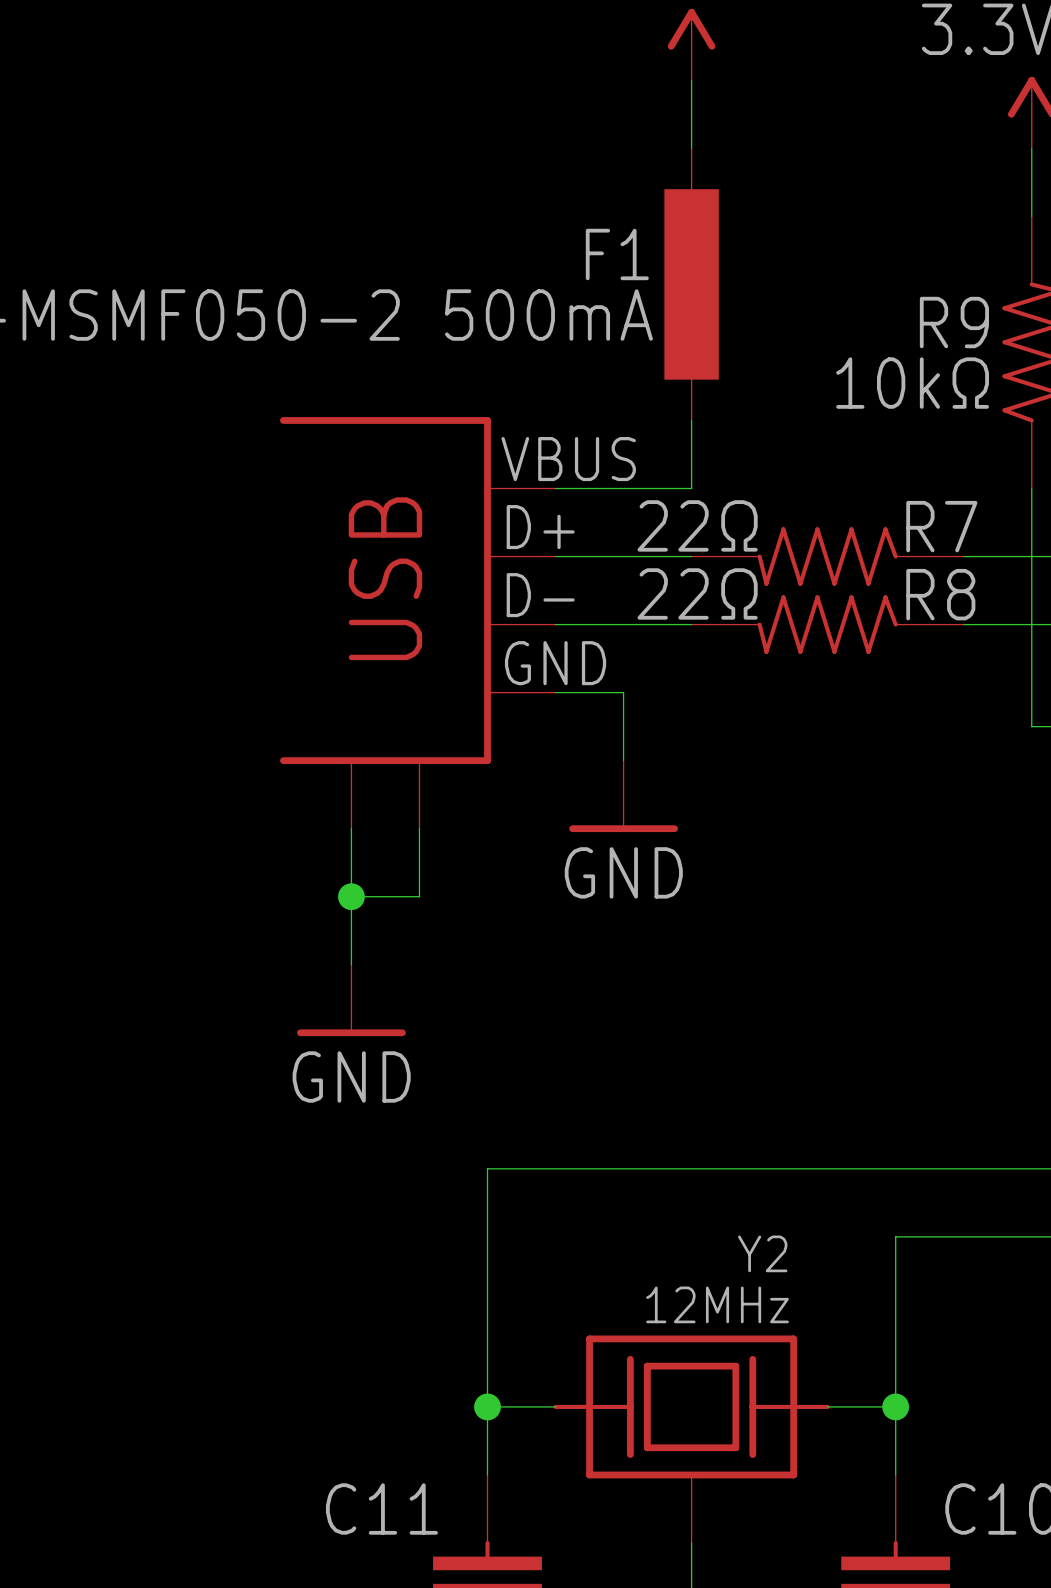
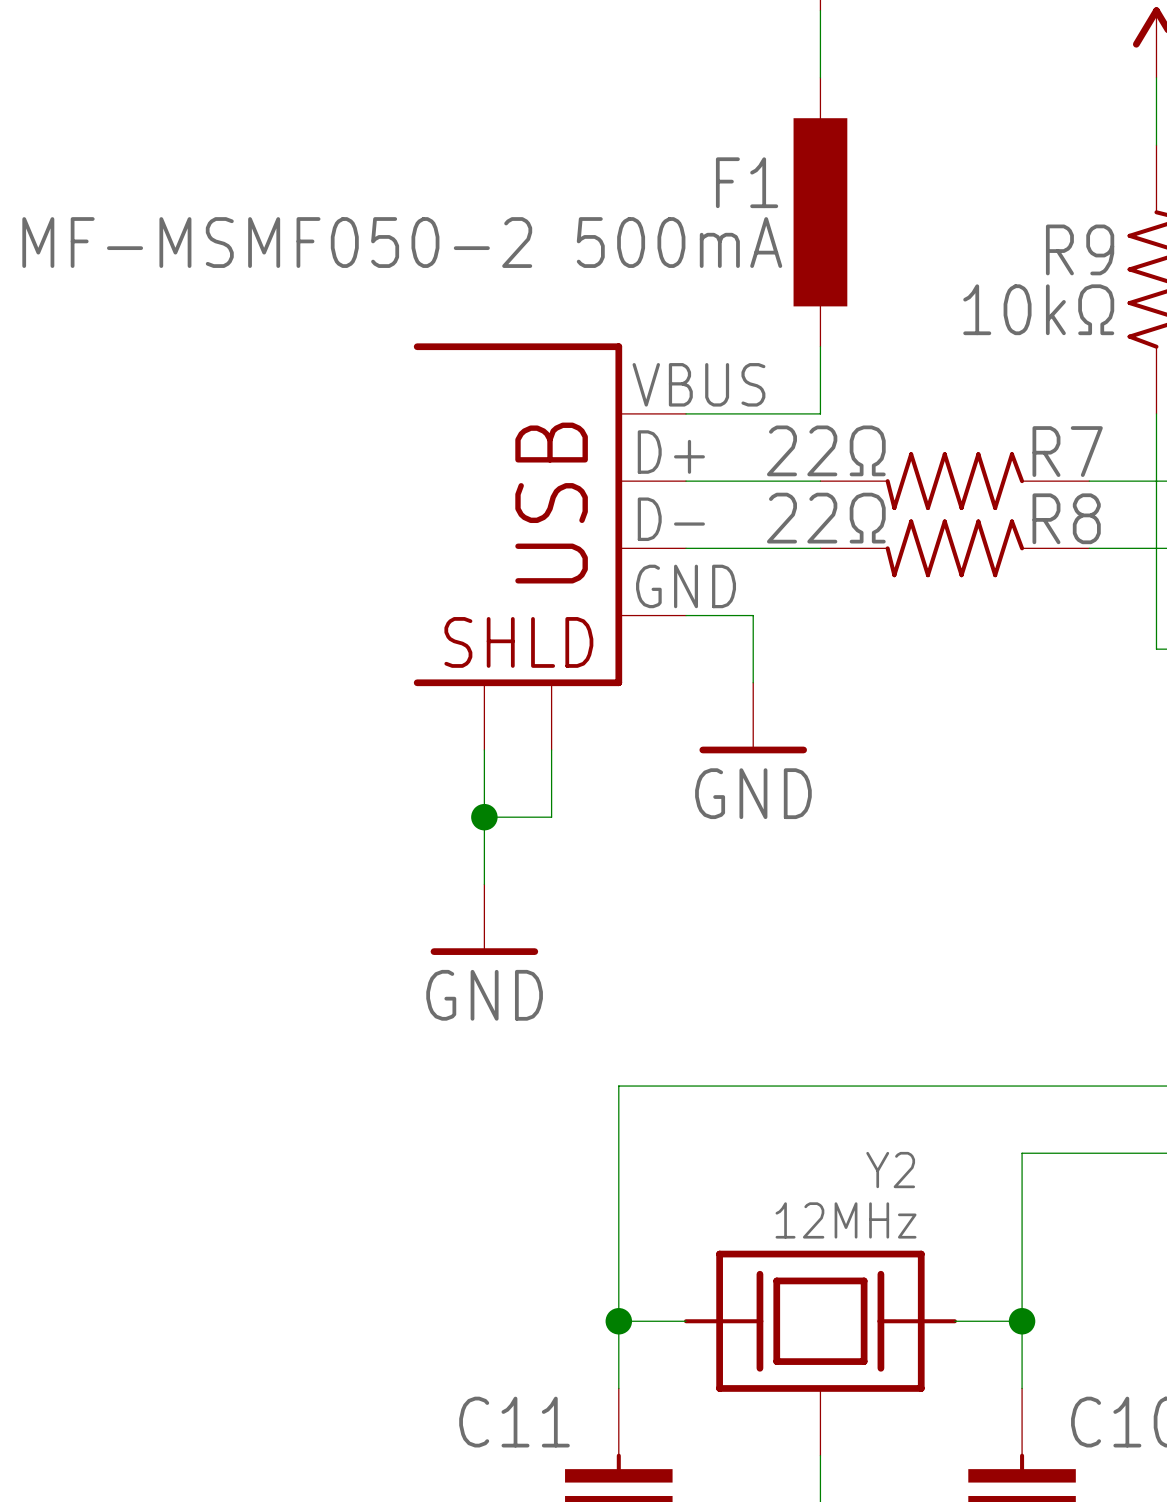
part text position: USB (385, 578) -> USB (551, 503)
part text: none -> SHLD (518, 642)

